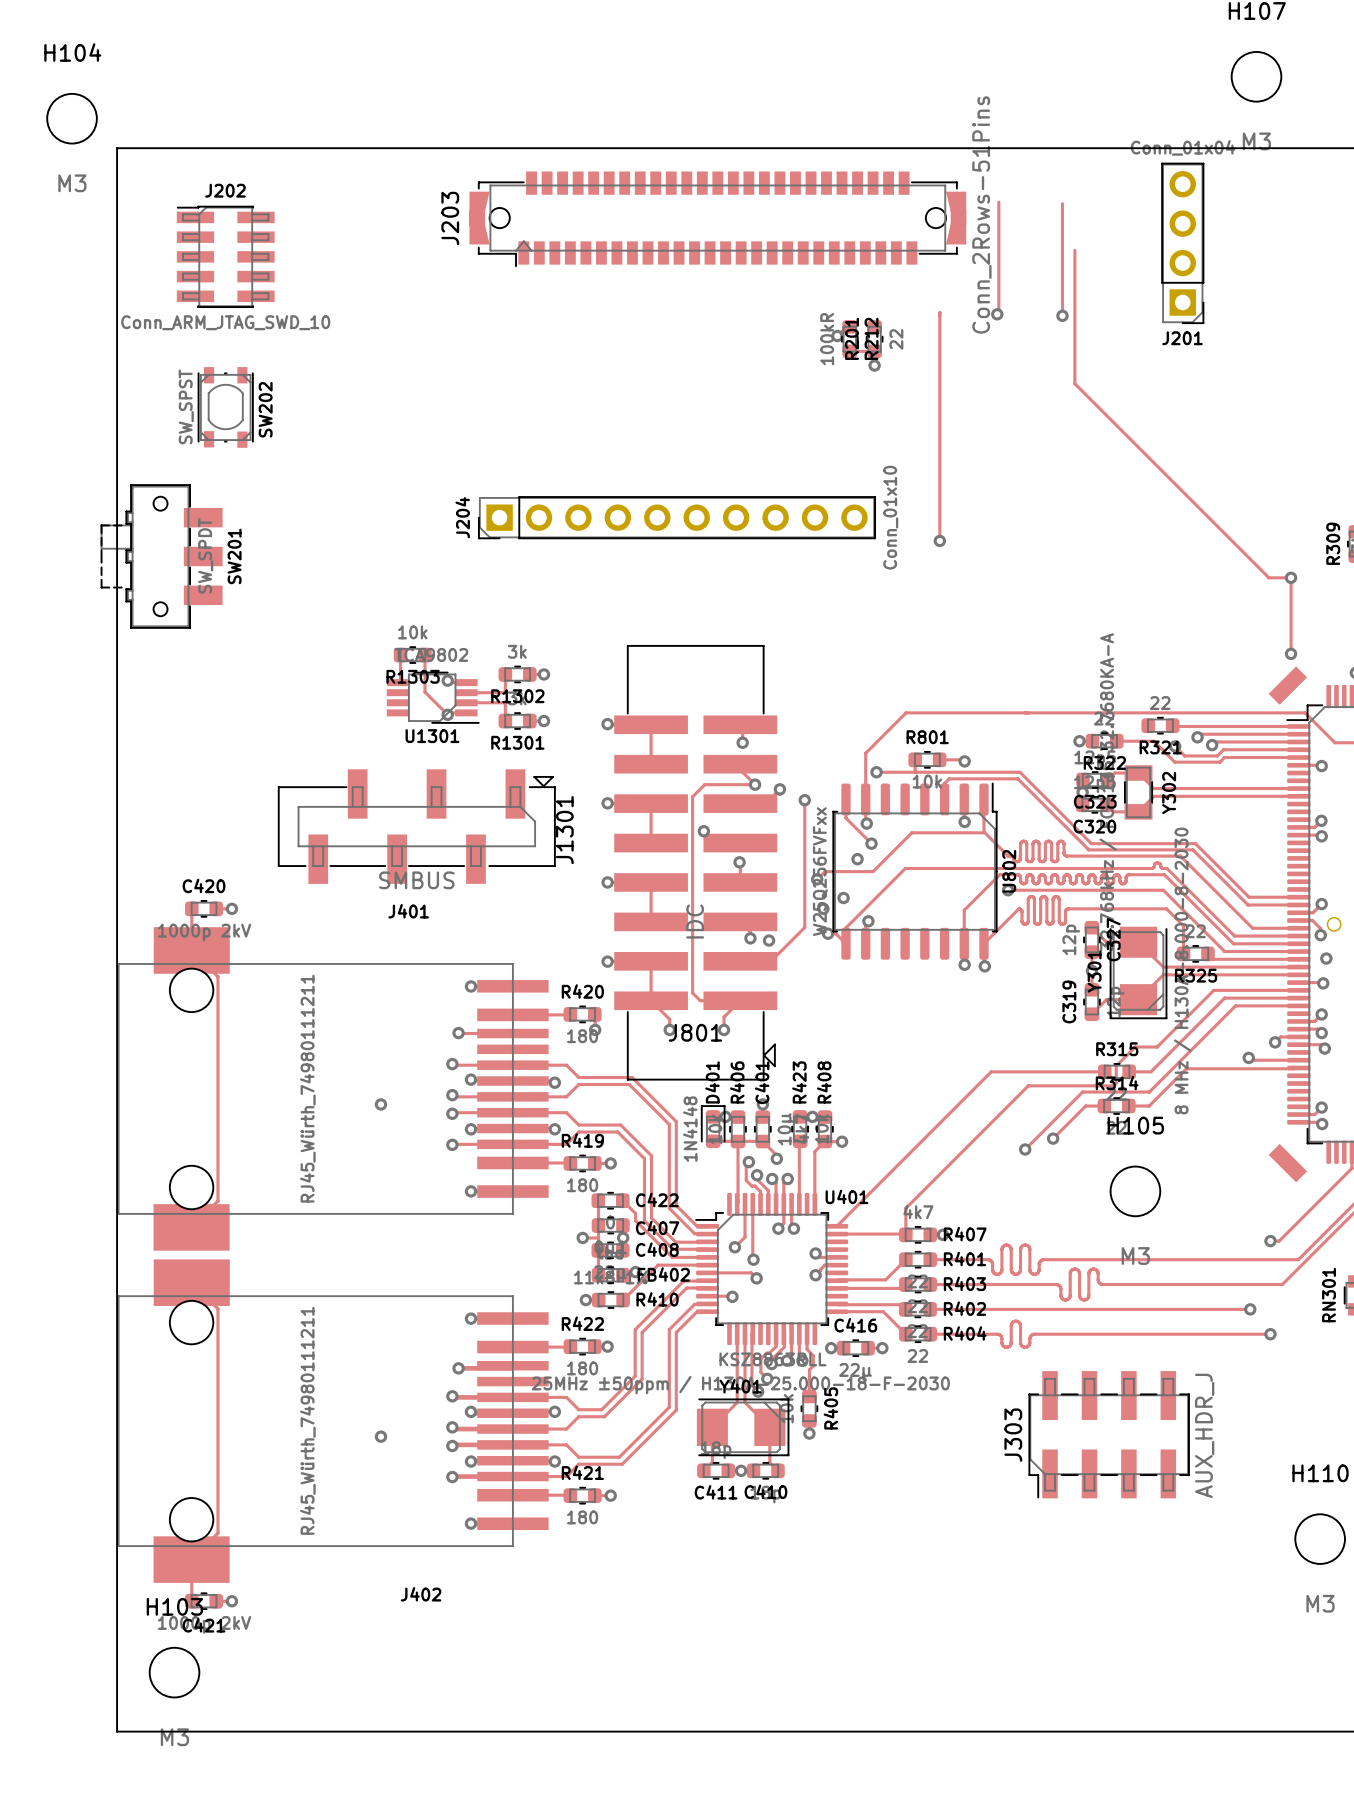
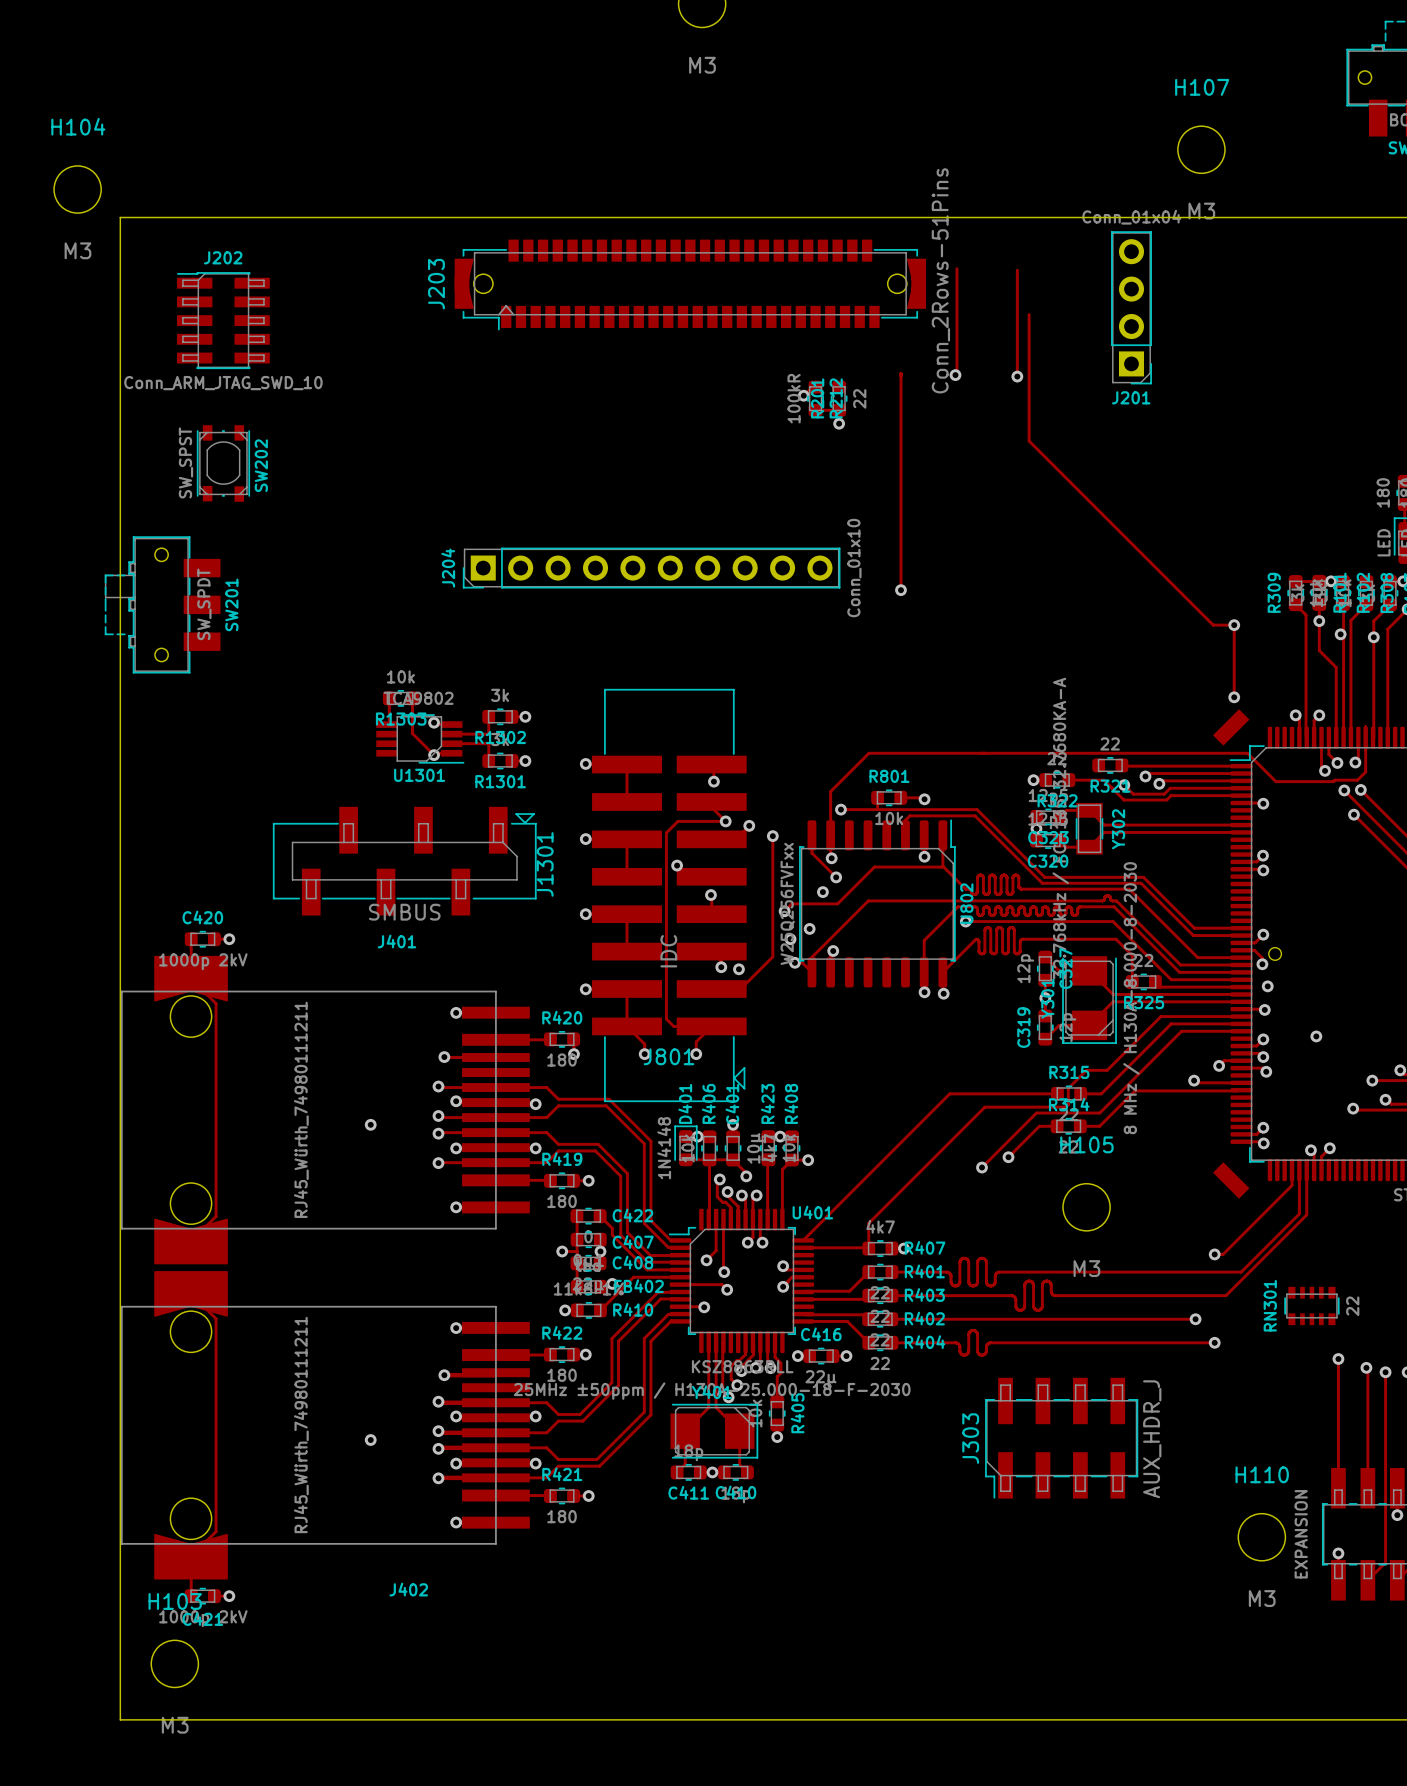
J401 footprint: [117, 927, 549, 1251] -> [120, 955, 530, 1265]
J402 footprint: [117, 1259, 549, 1583] -> [120, 1271, 530, 1580]

